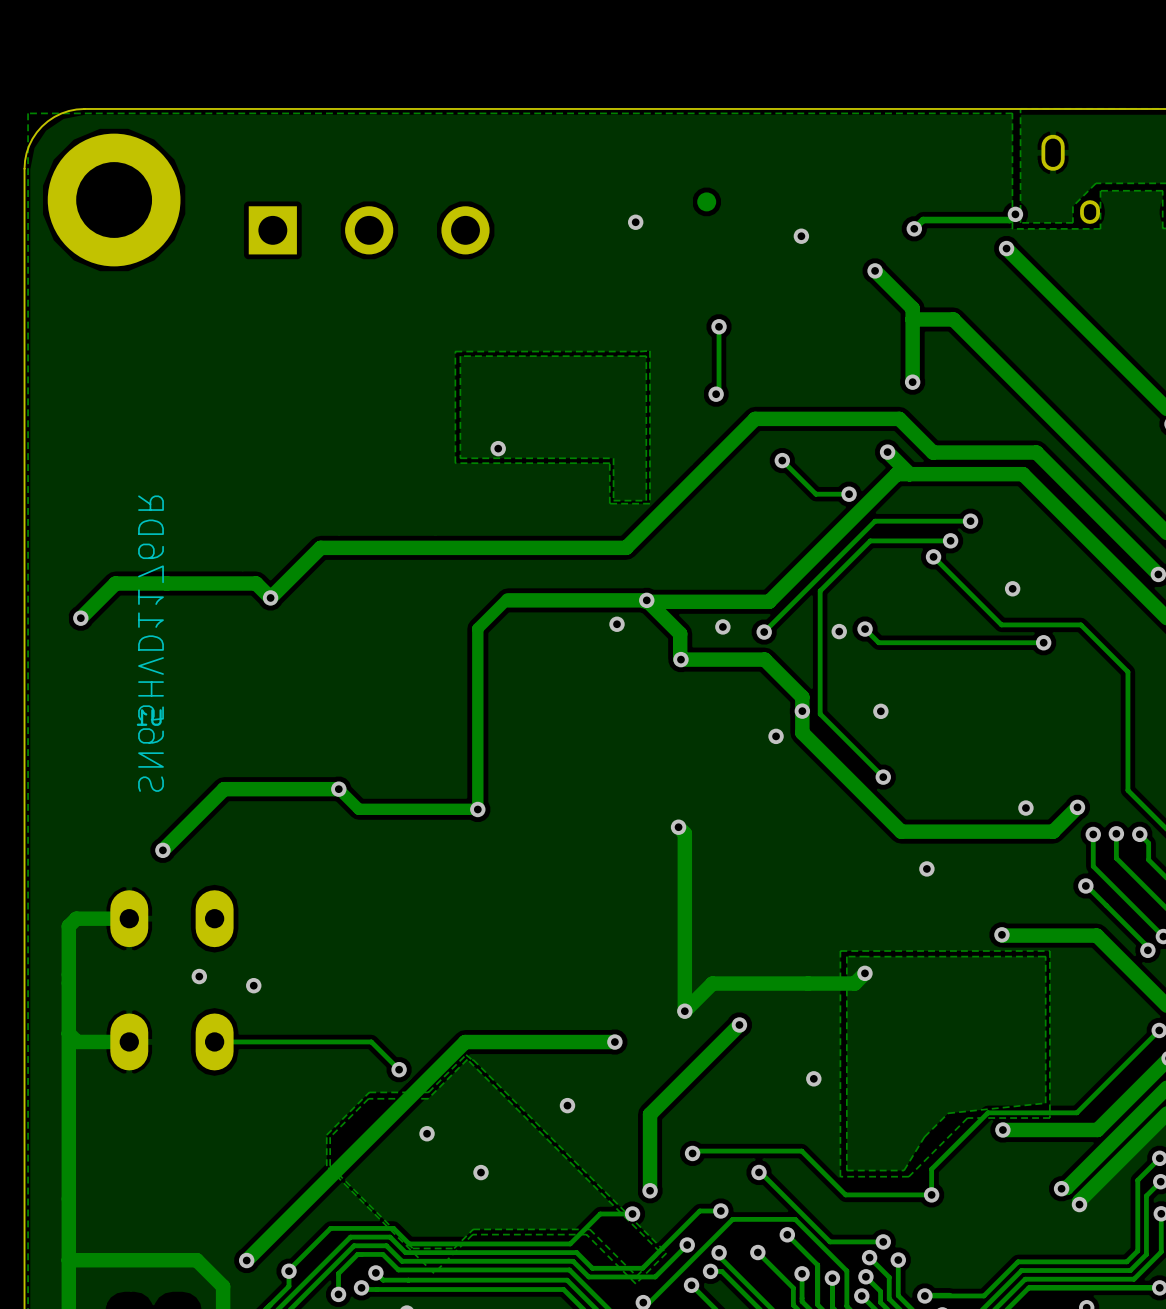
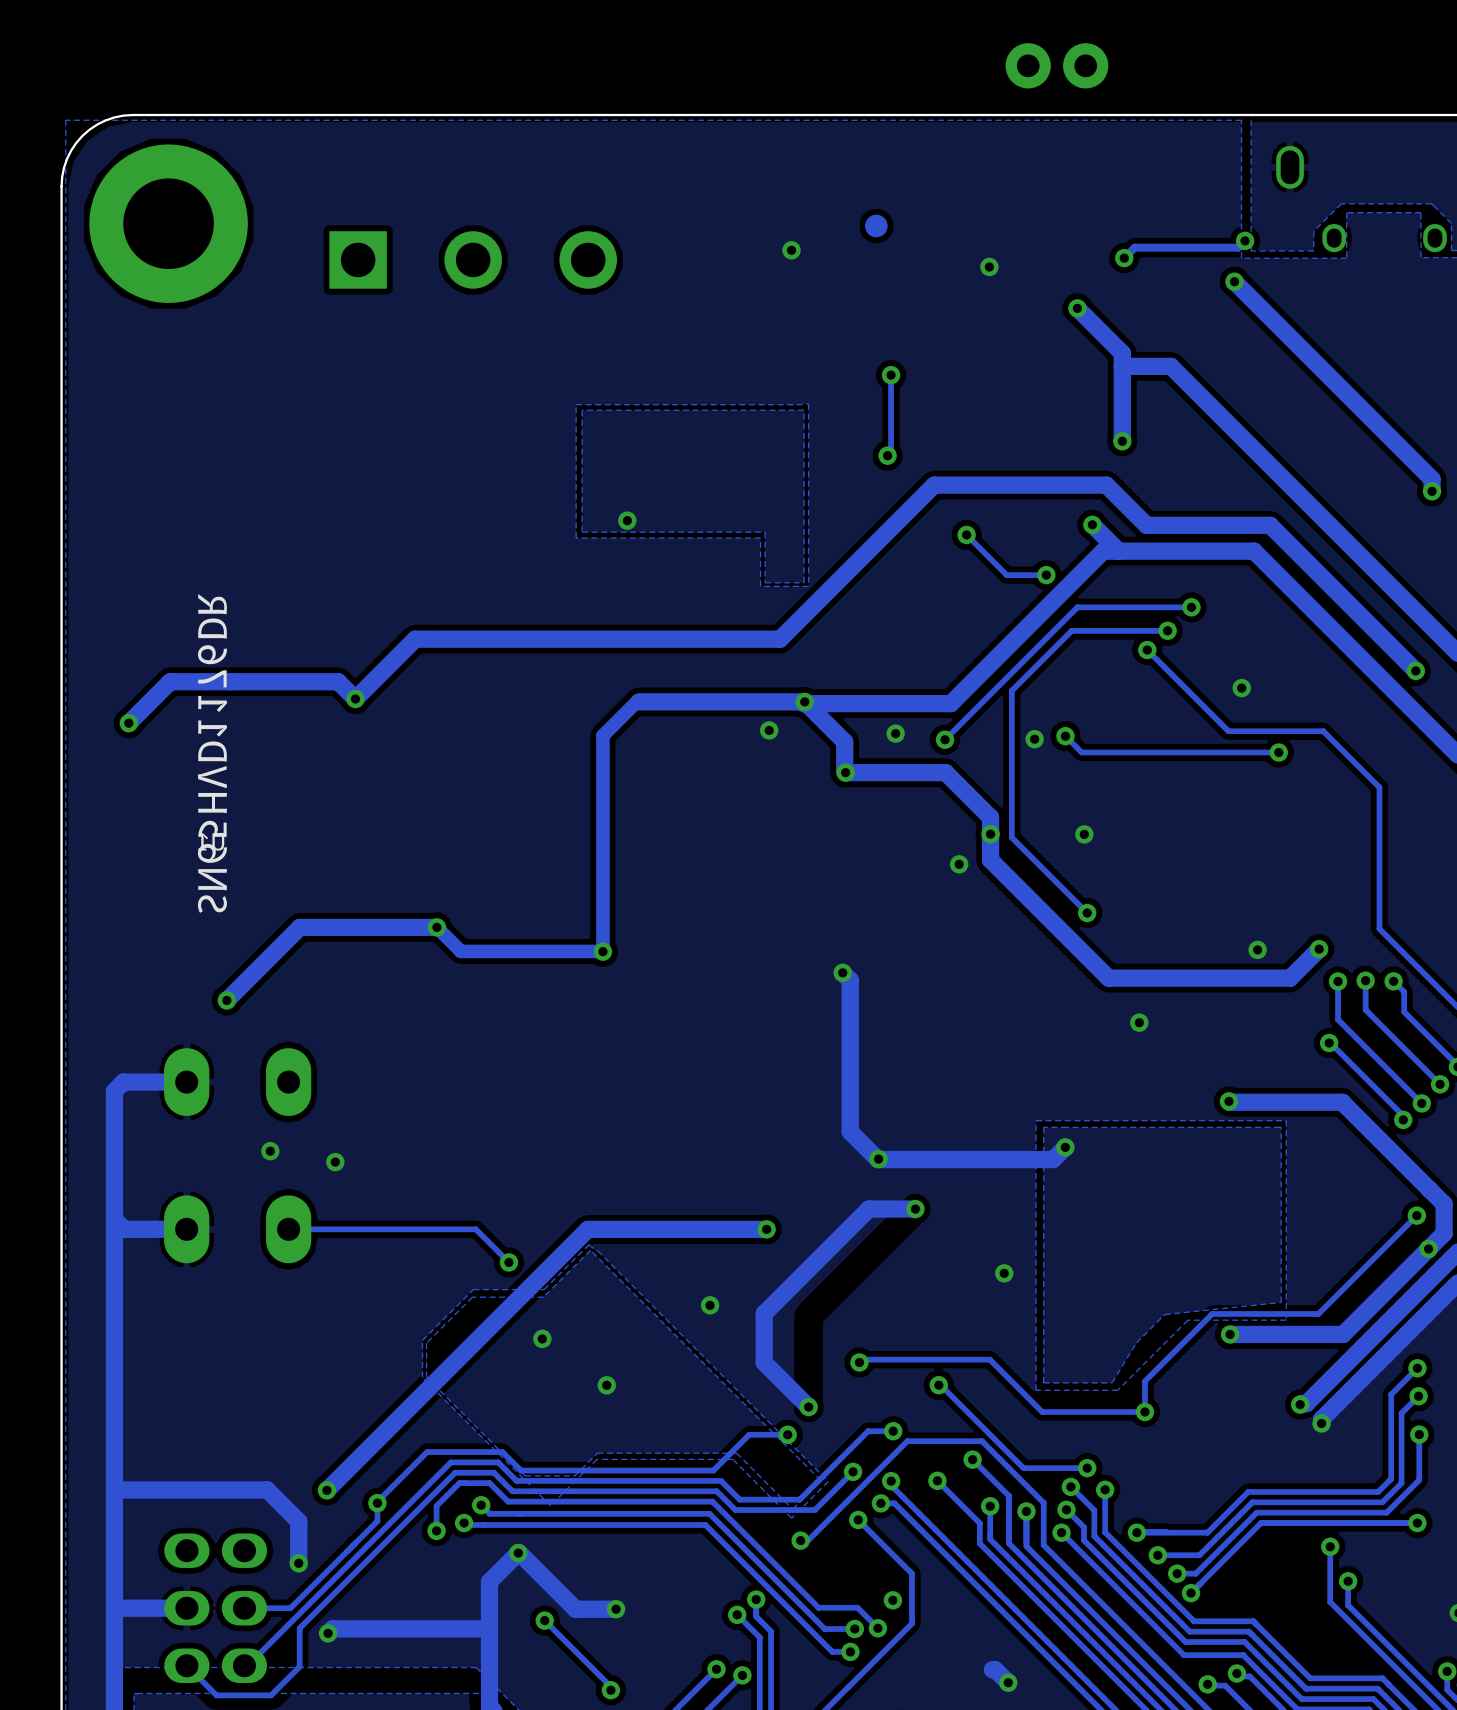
part: none -> (1056, 65)
track: (684, 960) (684, 1011) (712, 983) -> (850, 1131) (877, 1159) (883, 1159)
via position: (684, 1011) -> (878, 1159)
track: (739, 1024) (650, 1114) (650, 1190) -> (915, 1209) (868, 1209) (764, 1313) (764, 1362) (808, 1407)

